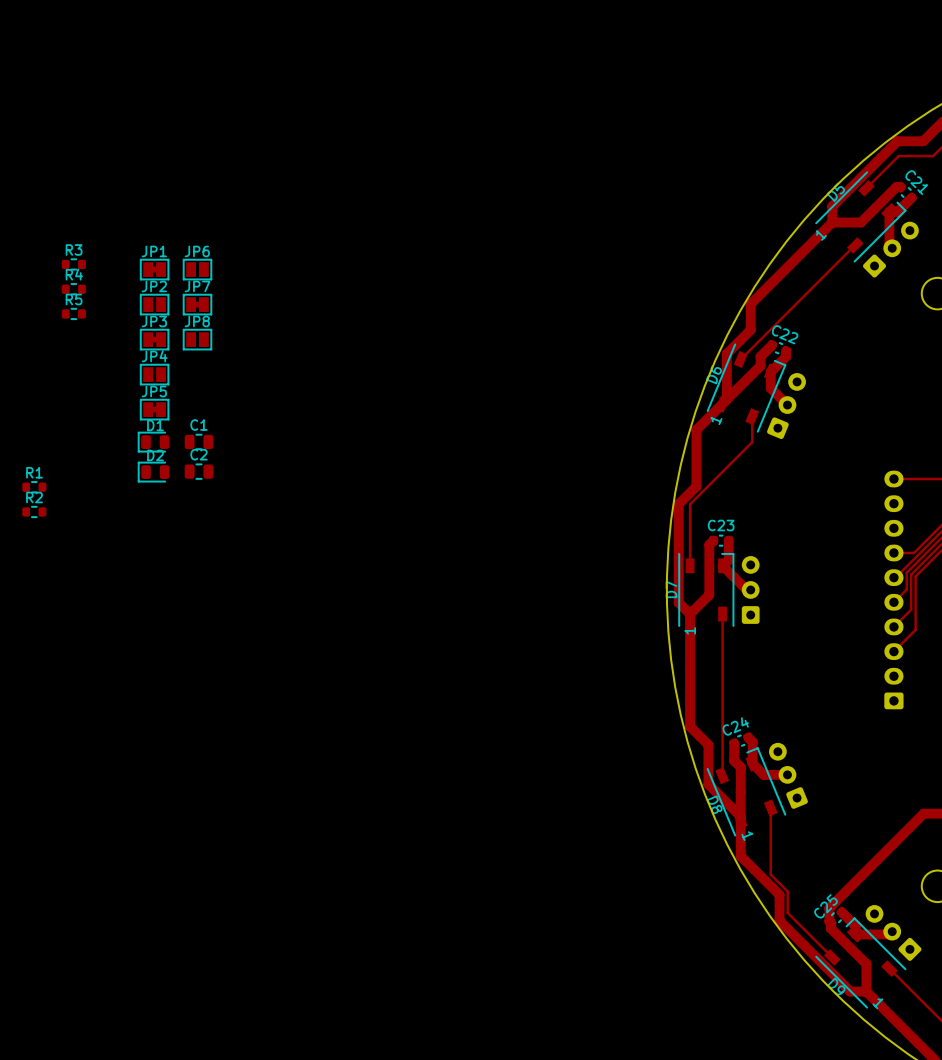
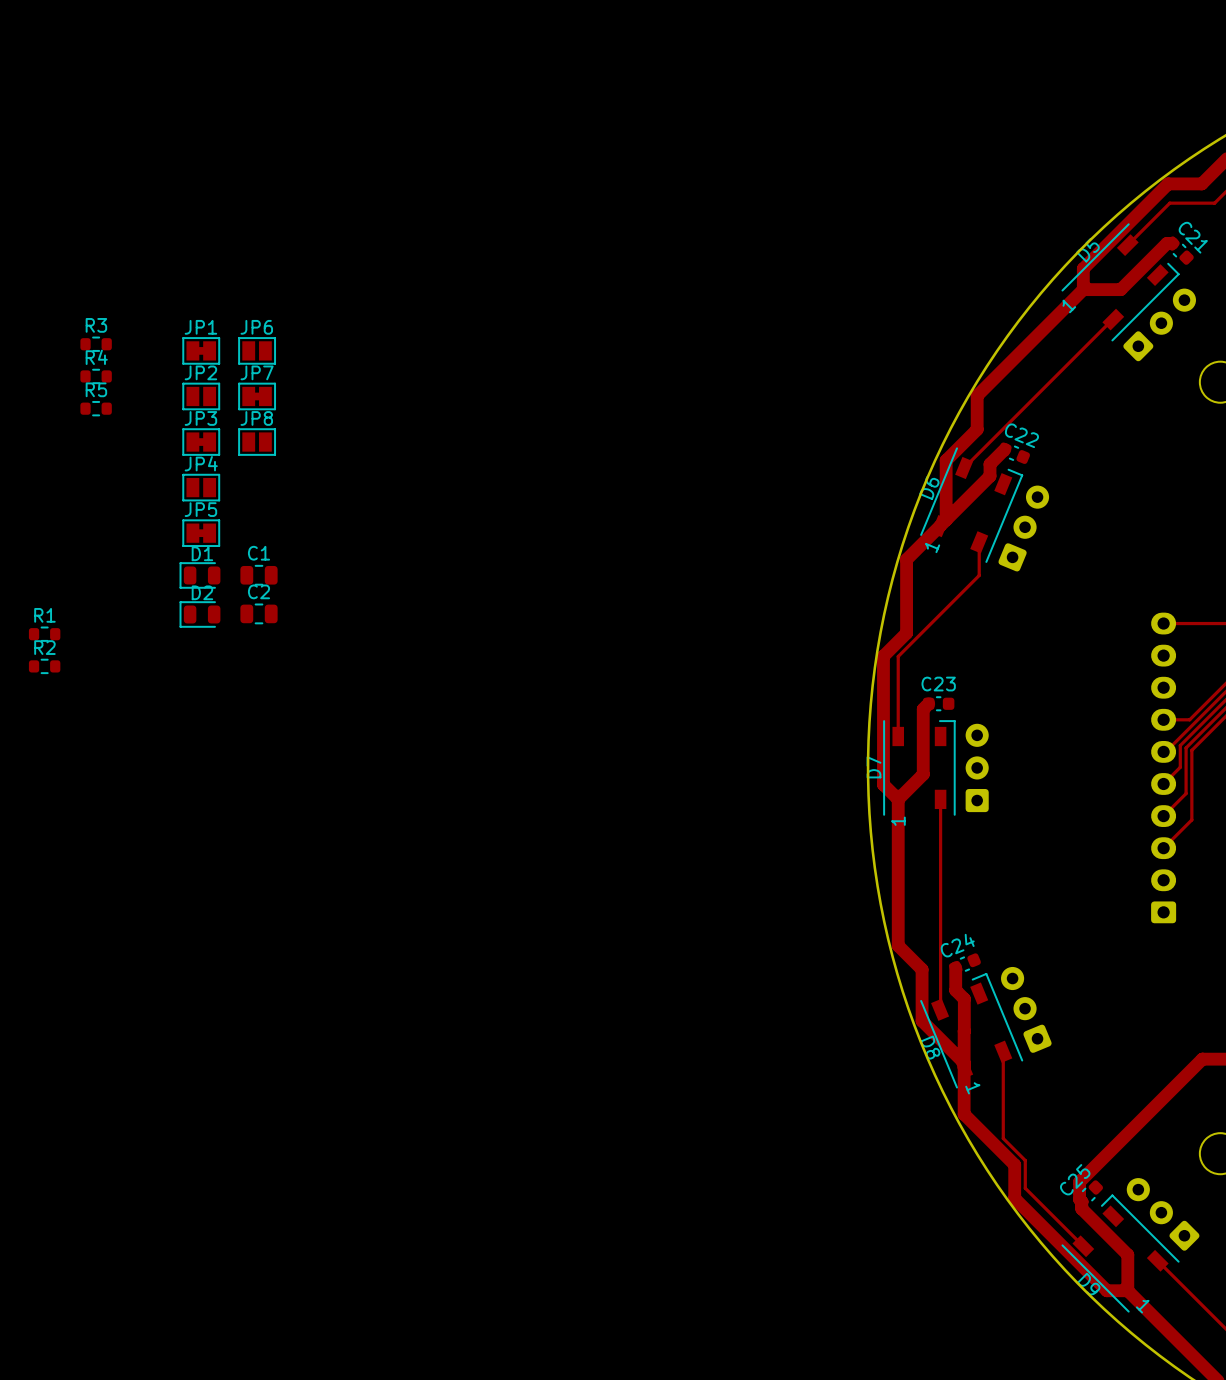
track: (911, 197) (897, 211) (889, 211) -> none
track: (889, 211) (889, 245) (892, 248) -> none
track: (786, 351) (786, 356) (770, 371) (770, 388) (787, 405) -> none
track: (728, 540) (728, 560) (723, 565) -> none
track: (722, 565) (746, 589) (750, 589) -> none
track: (748, 737) (752, 742) (752, 763) -> none
track: (752, 763) (763, 774) (787, 774) -> none
track: (841, 912) (855, 926) (855, 934) -> none
track: (892, 931) (889, 934) (855, 934) -> none

